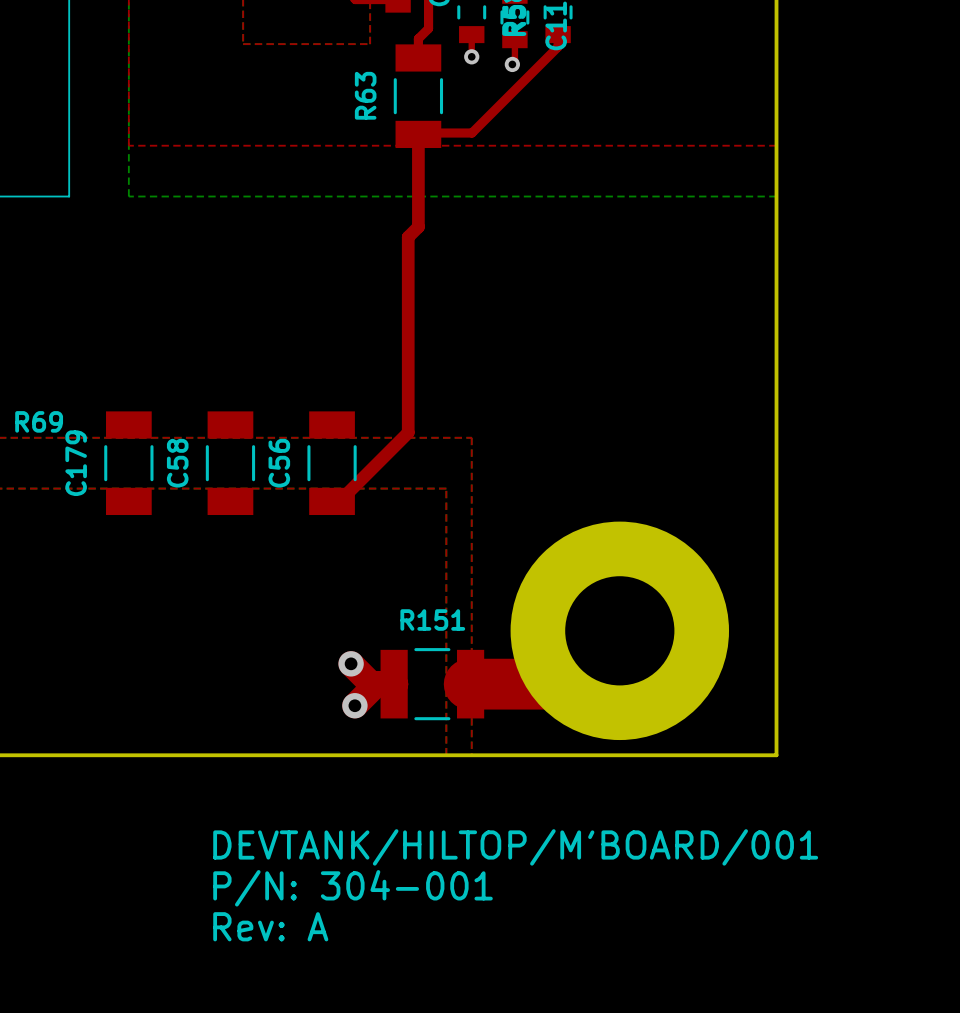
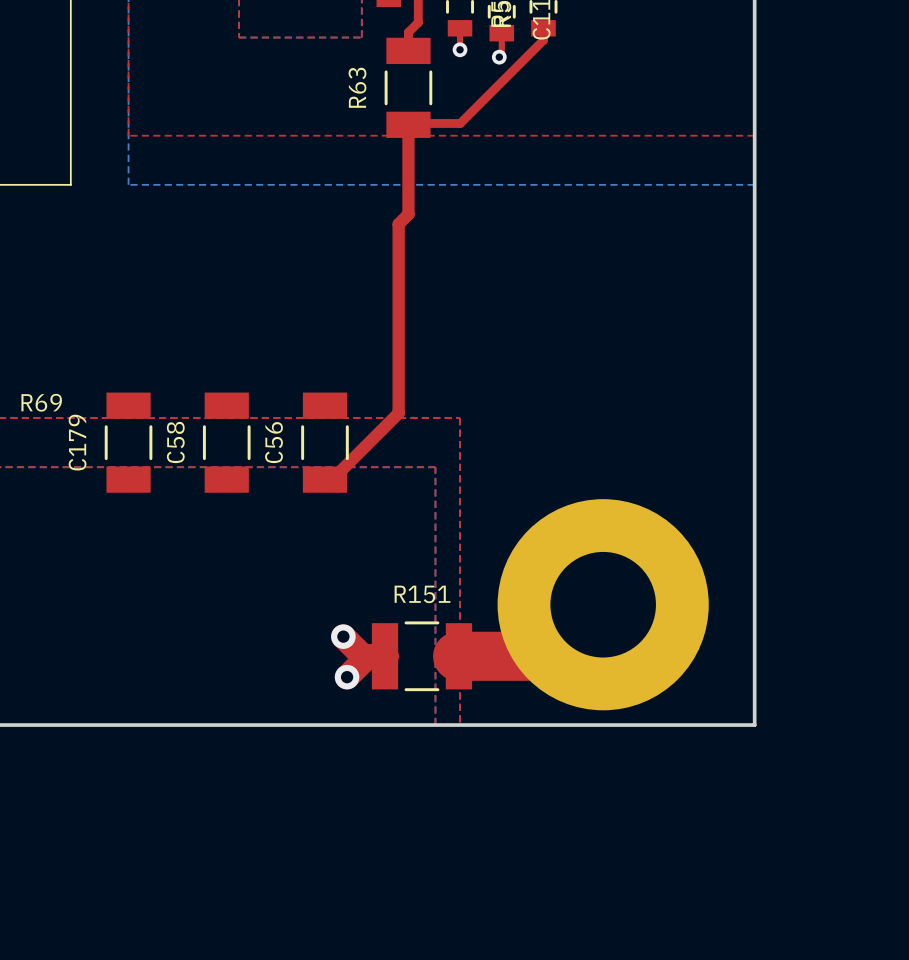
text: DEVTANK/HILTOP/M'BOARD/001 (515, 847) -> none
text: P/N: 304-001 (353, 888) -> none
text: Rev: A (270, 926) -> none

